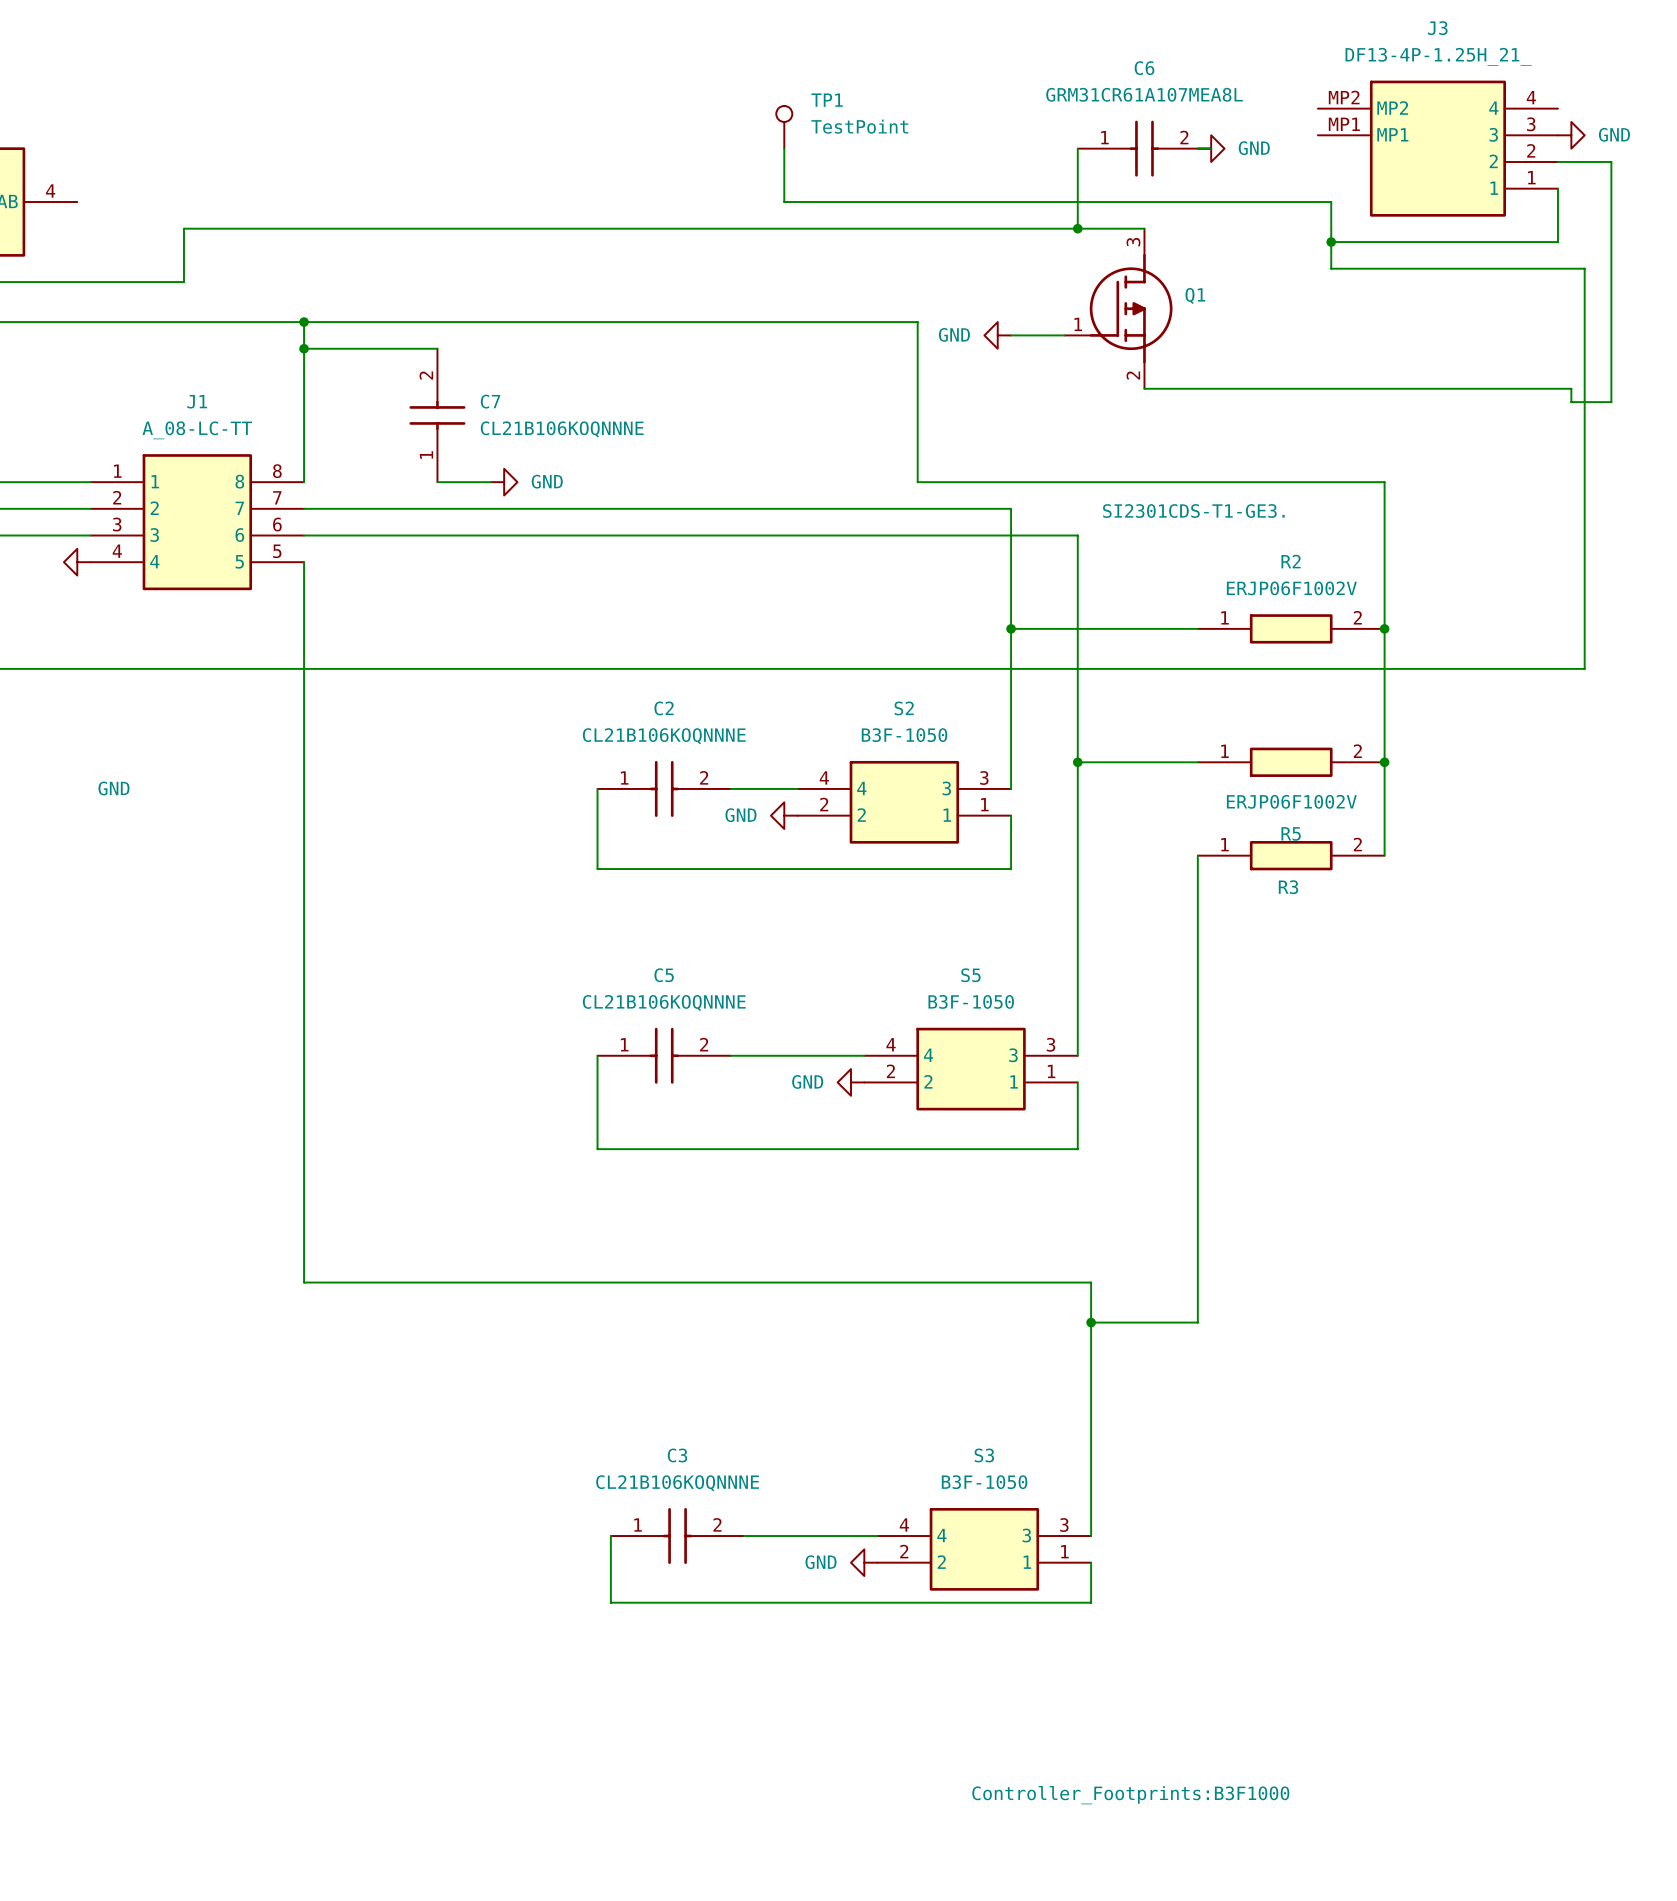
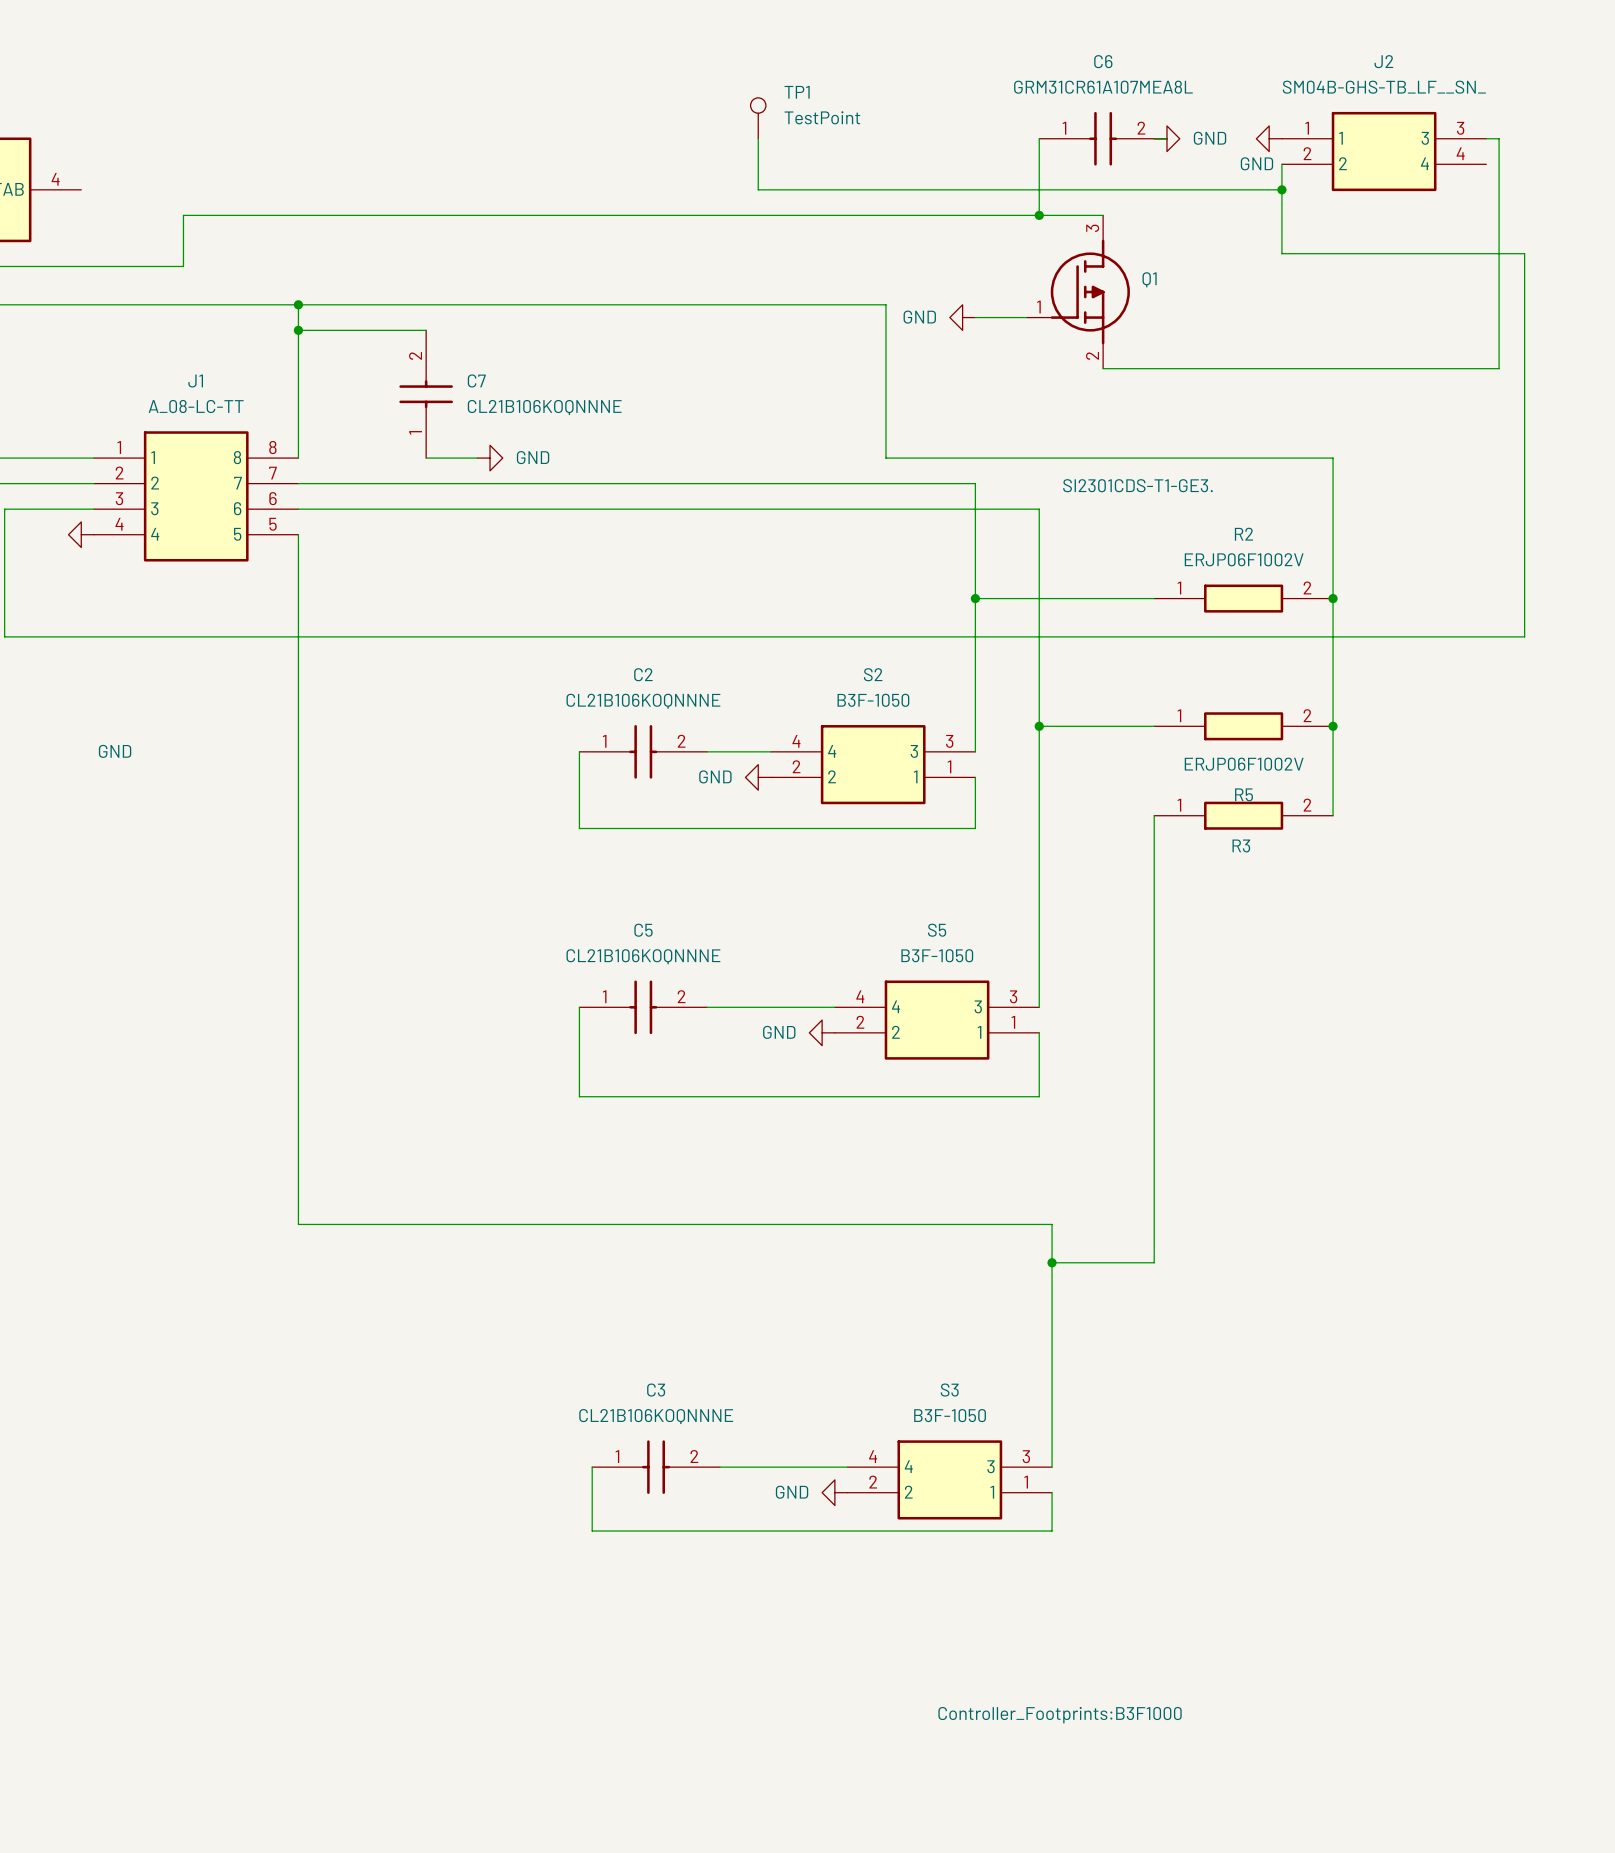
power symbol text position: GND (1614, 134) -> GND (1256, 163)
power symbol rotation: 0° (1571, 135) -> 180° (1269, 138)
power symbol position: GND (1571, 135) -> GND (1269, 138)
J3: DF13-4P-1.25H_21_ (1437, 148) -> none
wire: none -> (1486, 138) (1499, 138) (1499, 177)
J2: none -> SM04B-GHS-TB_LF__SN_ (1384, 151)
wire: (1558, 161) (1611, 161) (1611, 402) (1571, 402) (1571, 388) (1558, 388) -> (1499, 228) (1499, 368)
wire: none -> (1281, 164) (1281, 189)
wire: (1331, 242) (1558, 242) -> none
junction position: (1331, 242) -> (1281, 189)

